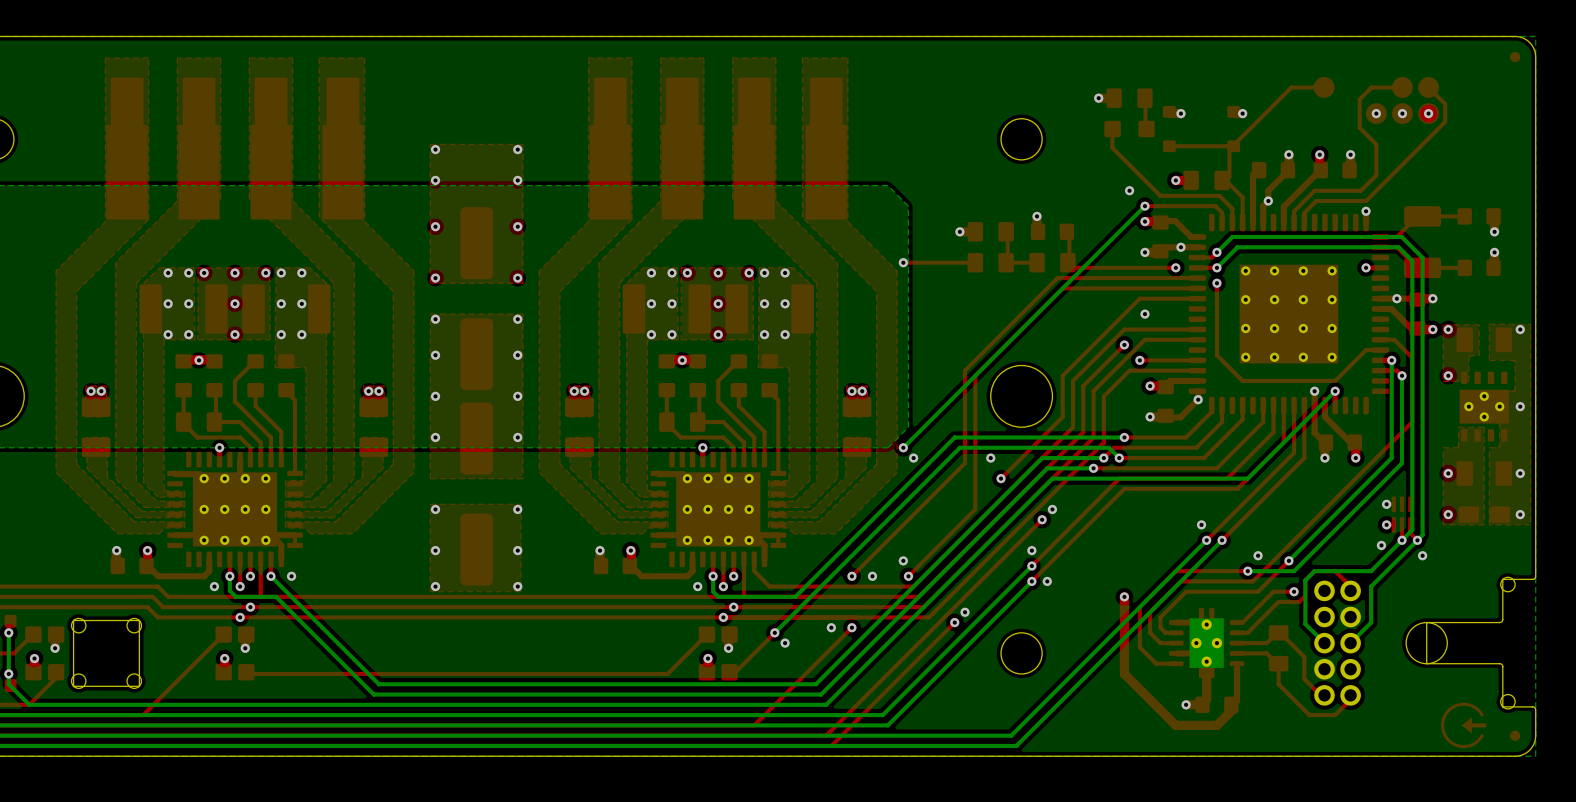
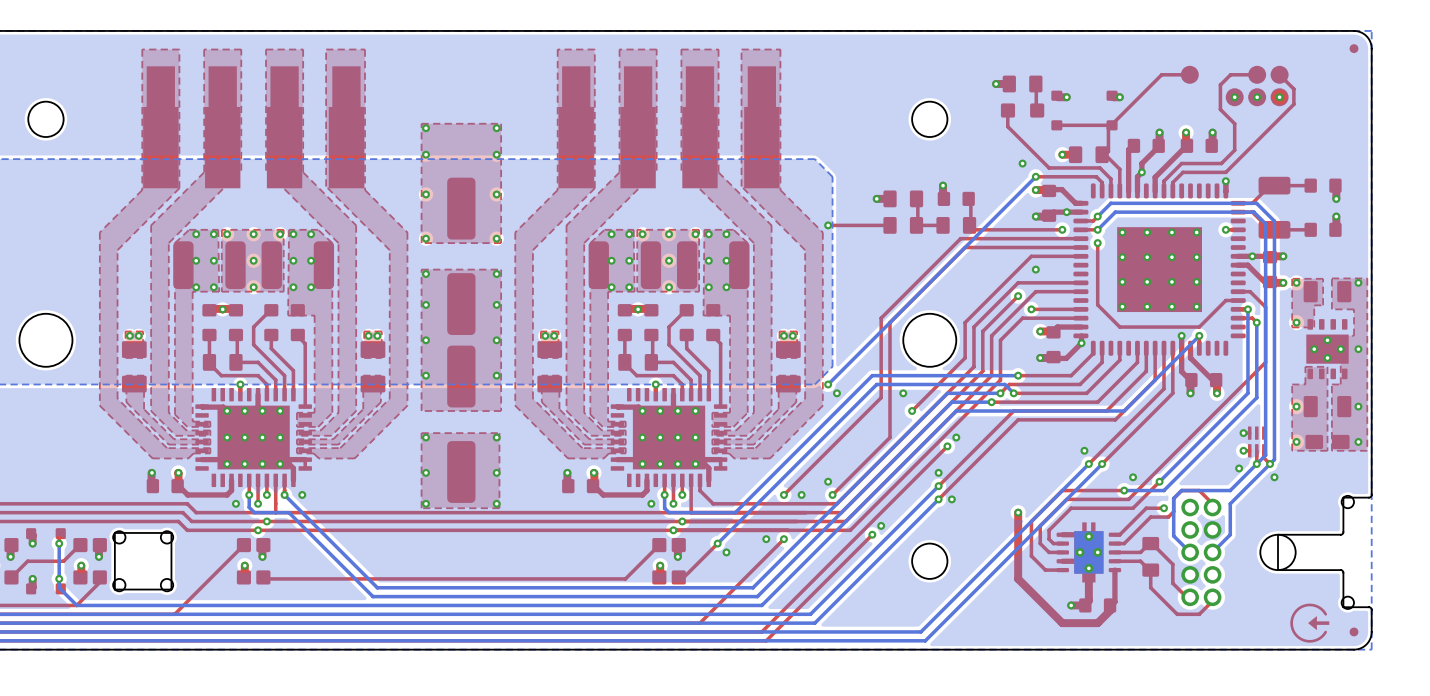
part footprint: [139, 284, 228, 334] -> [173, 241, 246, 290]
part footprint: [242, 284, 331, 334] -> [261, 241, 335, 290]
part footprint: [622, 284, 712, 334] -> [588, 241, 662, 290]
part footprint: [725, 284, 814, 334] -> [677, 241, 750, 290]

